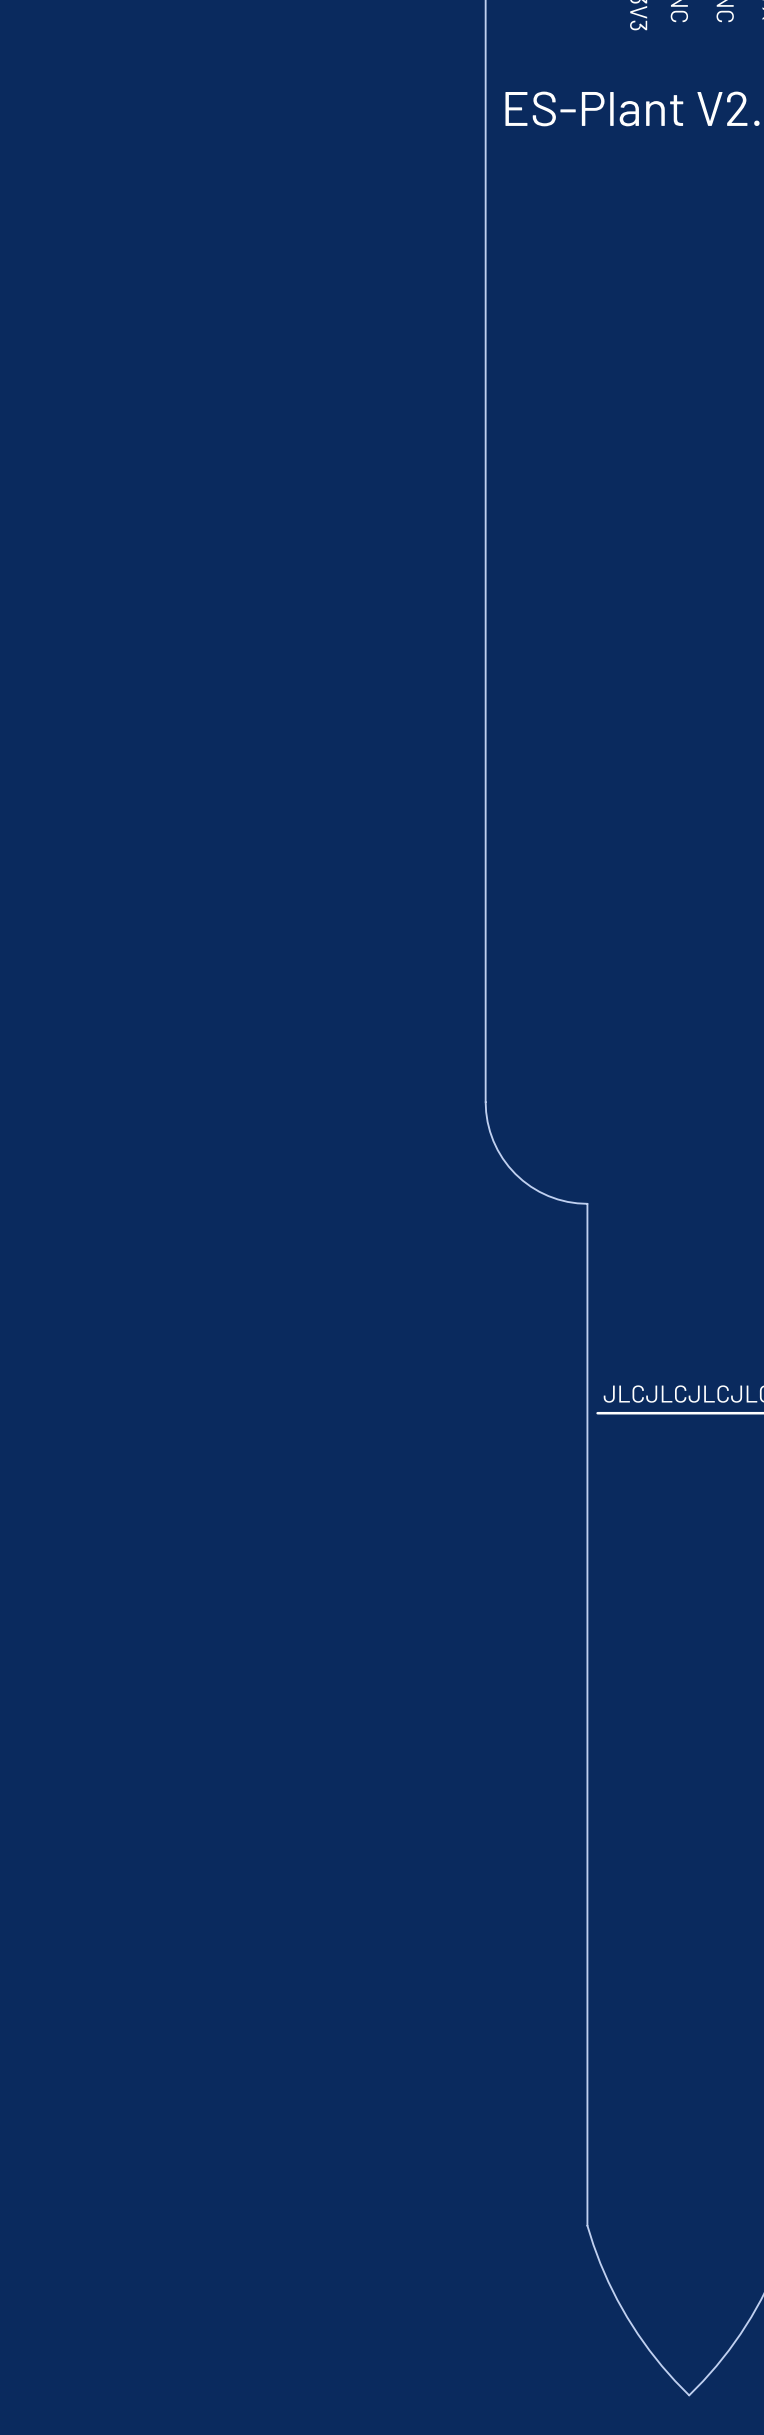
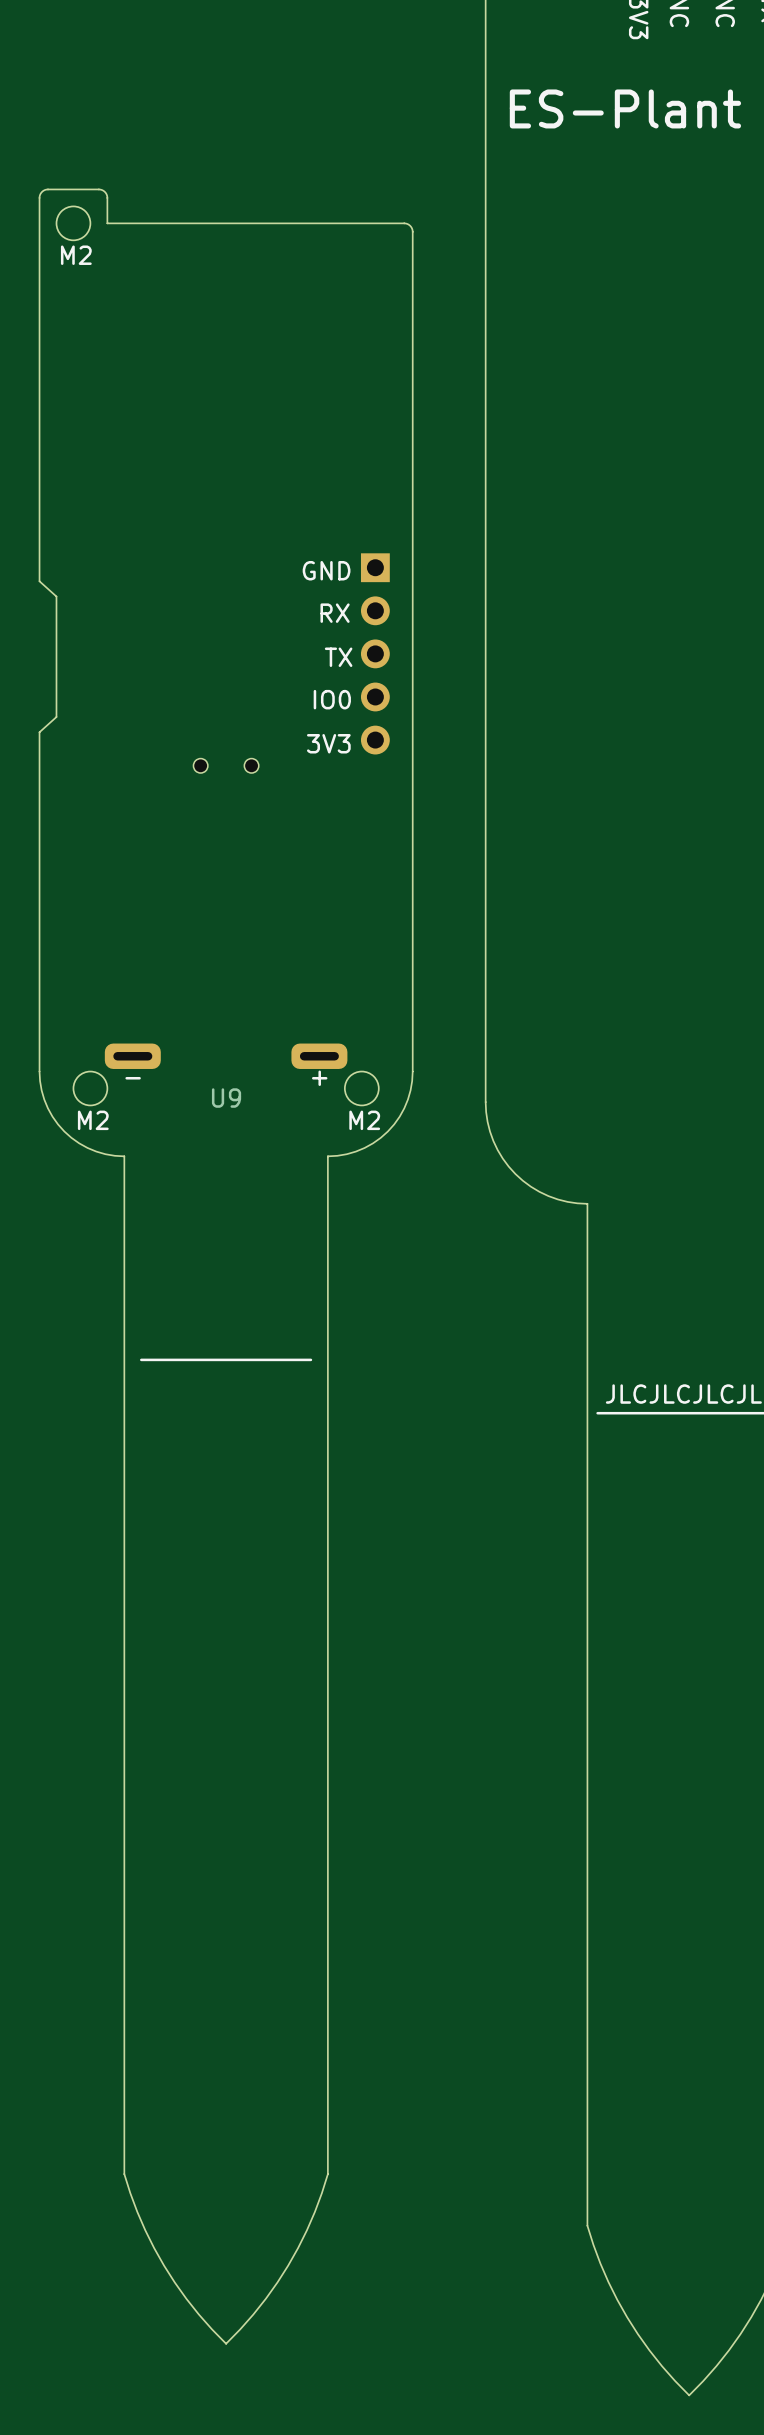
board edge: none -> (98, 189) (46, 189) (42, 191) (39, 196) (39, 581) (56, 596) (56, 717) (39, 732) (40, 1081) (47, 1108) (58, 1124) (71, 1137) (96, 1151) (124, 1156) (124, 2174) (145, 2230) (164, 2265) (186, 2298) (226, 2343) (253, 2314) (288, 2265) (314, 2211) (327, 2174) (327, 1156) (355, 1151) (380, 1137) (394, 1124) (404, 1108) (412, 1081) (412, 231) (410, 225) (404, 223) (107, 223) (107, 195) (104, 191) (98, 189)
round board edge: none -> [55, 205, 92, 242]
text: none -> M2 (76, 255)
text: none -> GND (326, 570)
text: none -> RX (335, 613)
part: none -> (375, 653)
text: none -> TX (338, 657)
text: none -> IO0 (332, 699)
text: none -> 3V3 (328, 743)
part: none -> (226, 765)
U9: none -> (226, 1056)
round board edge: none -> [72, 1070, 109, 1107]
round board edge: none -> [344, 1070, 380, 1107]
text: none -> - (133, 1078)
text: none -> + (319, 1078)
text: none -> M2 (93, 1120)
text: none -> M2 (364, 1120)
line: none -> (310, 1359) (141, 1359)

